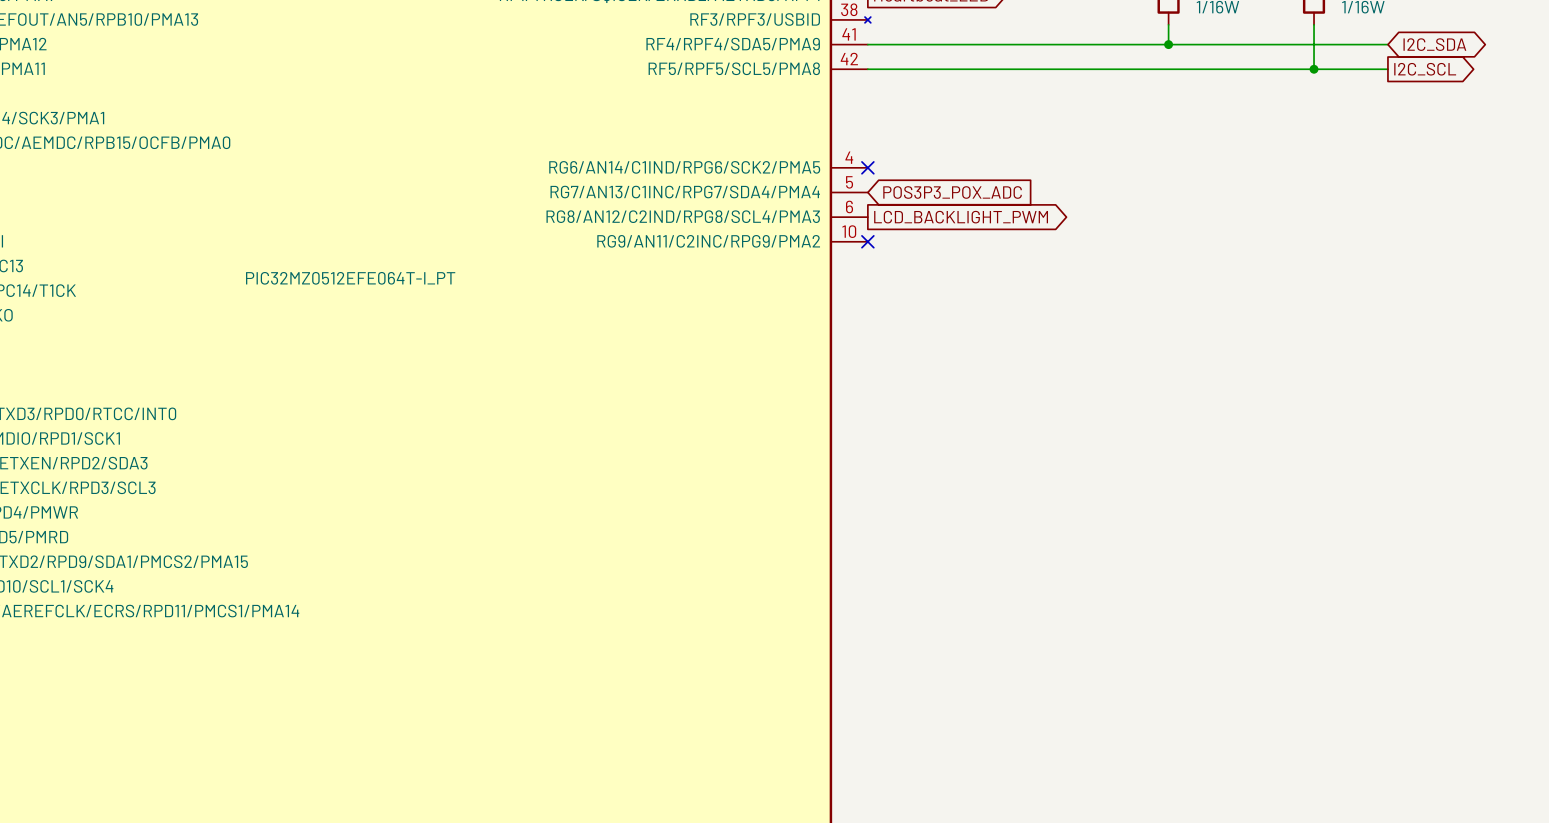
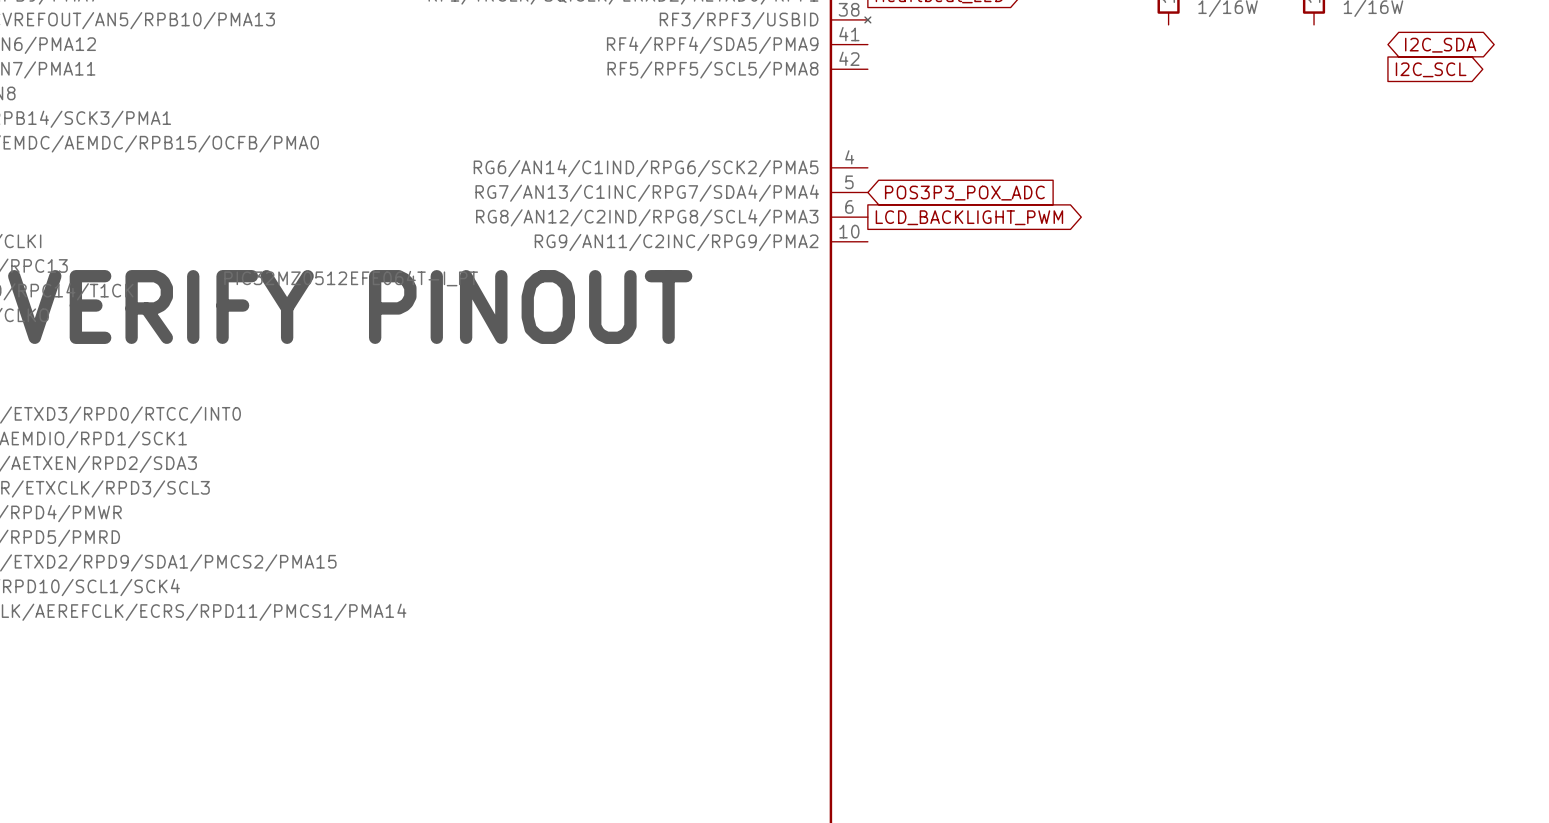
wire: (1168, 24) (1168, 44) -> none
wire: (1314, 24) (1314, 69) -> none
wire: (867, 44) (1387, 44) -> none
junction: (1168, 44) -> none
wire: (867, 69) (1387, 69) -> none
junction: (1314, 69) -> none
no-connect mark: (867, 167) -> none
no-connect mark: (867, 241) -> none
text: none -> VERIFY PINOUT (350, 306)

